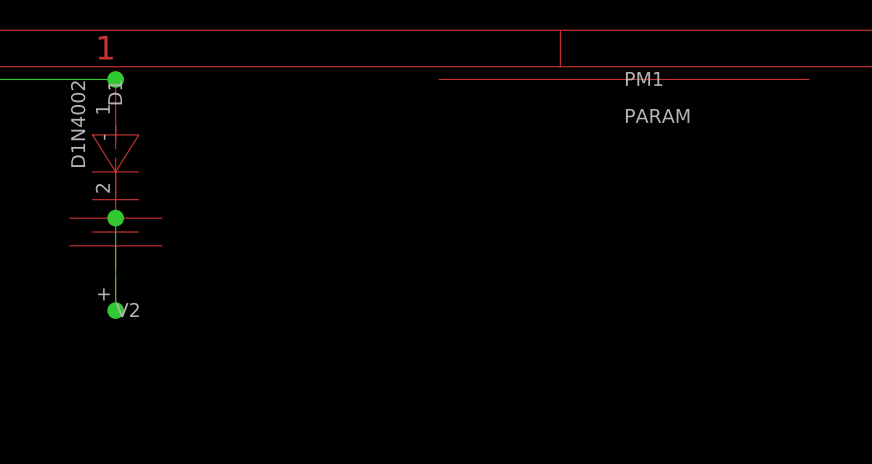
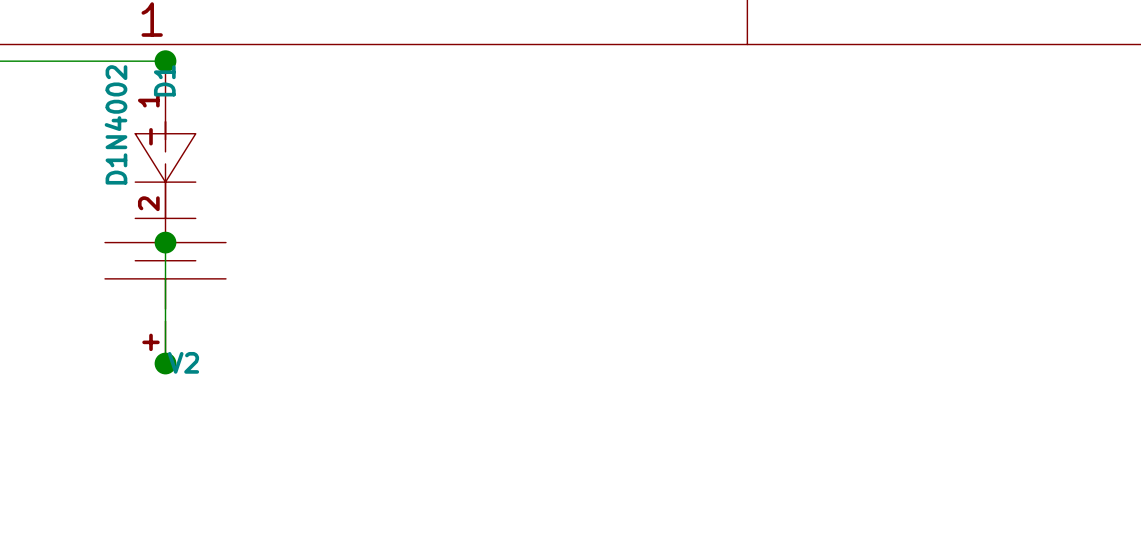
PM1: PARAM (624, 79) -> none

